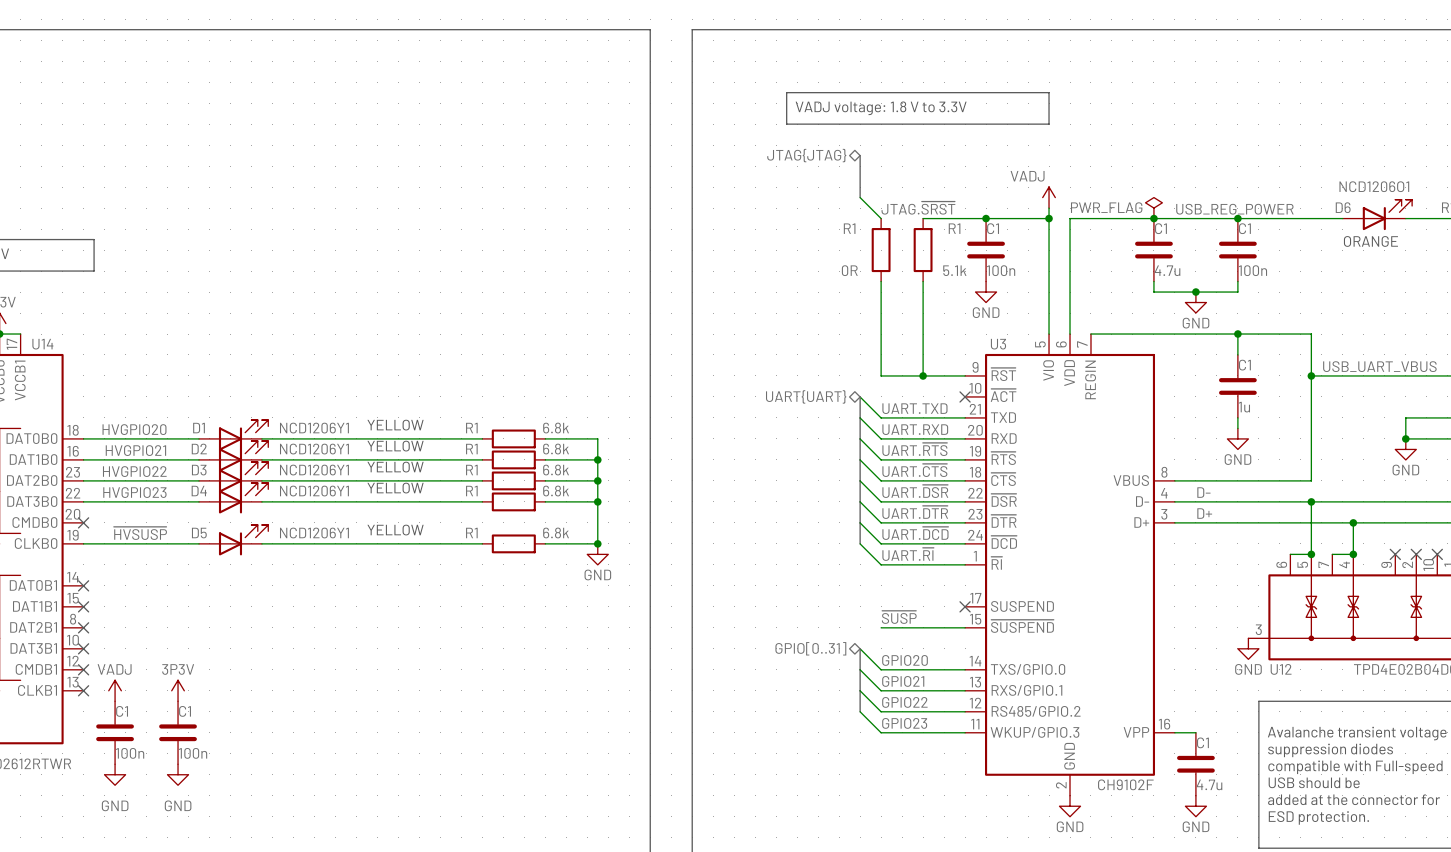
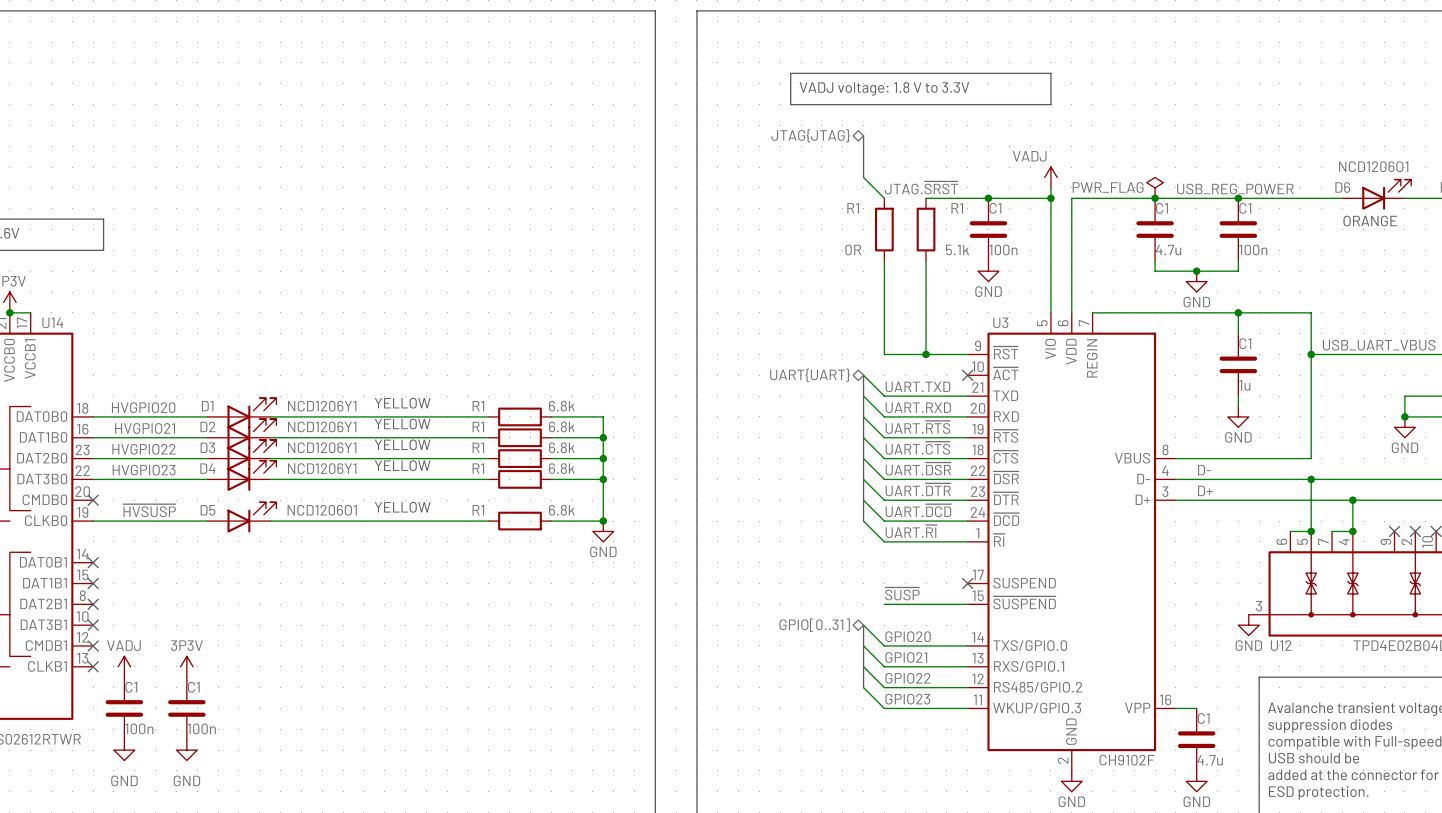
D5 value: NCD1206Y1 (314, 533) -> NCD1206O1 (322, 510)

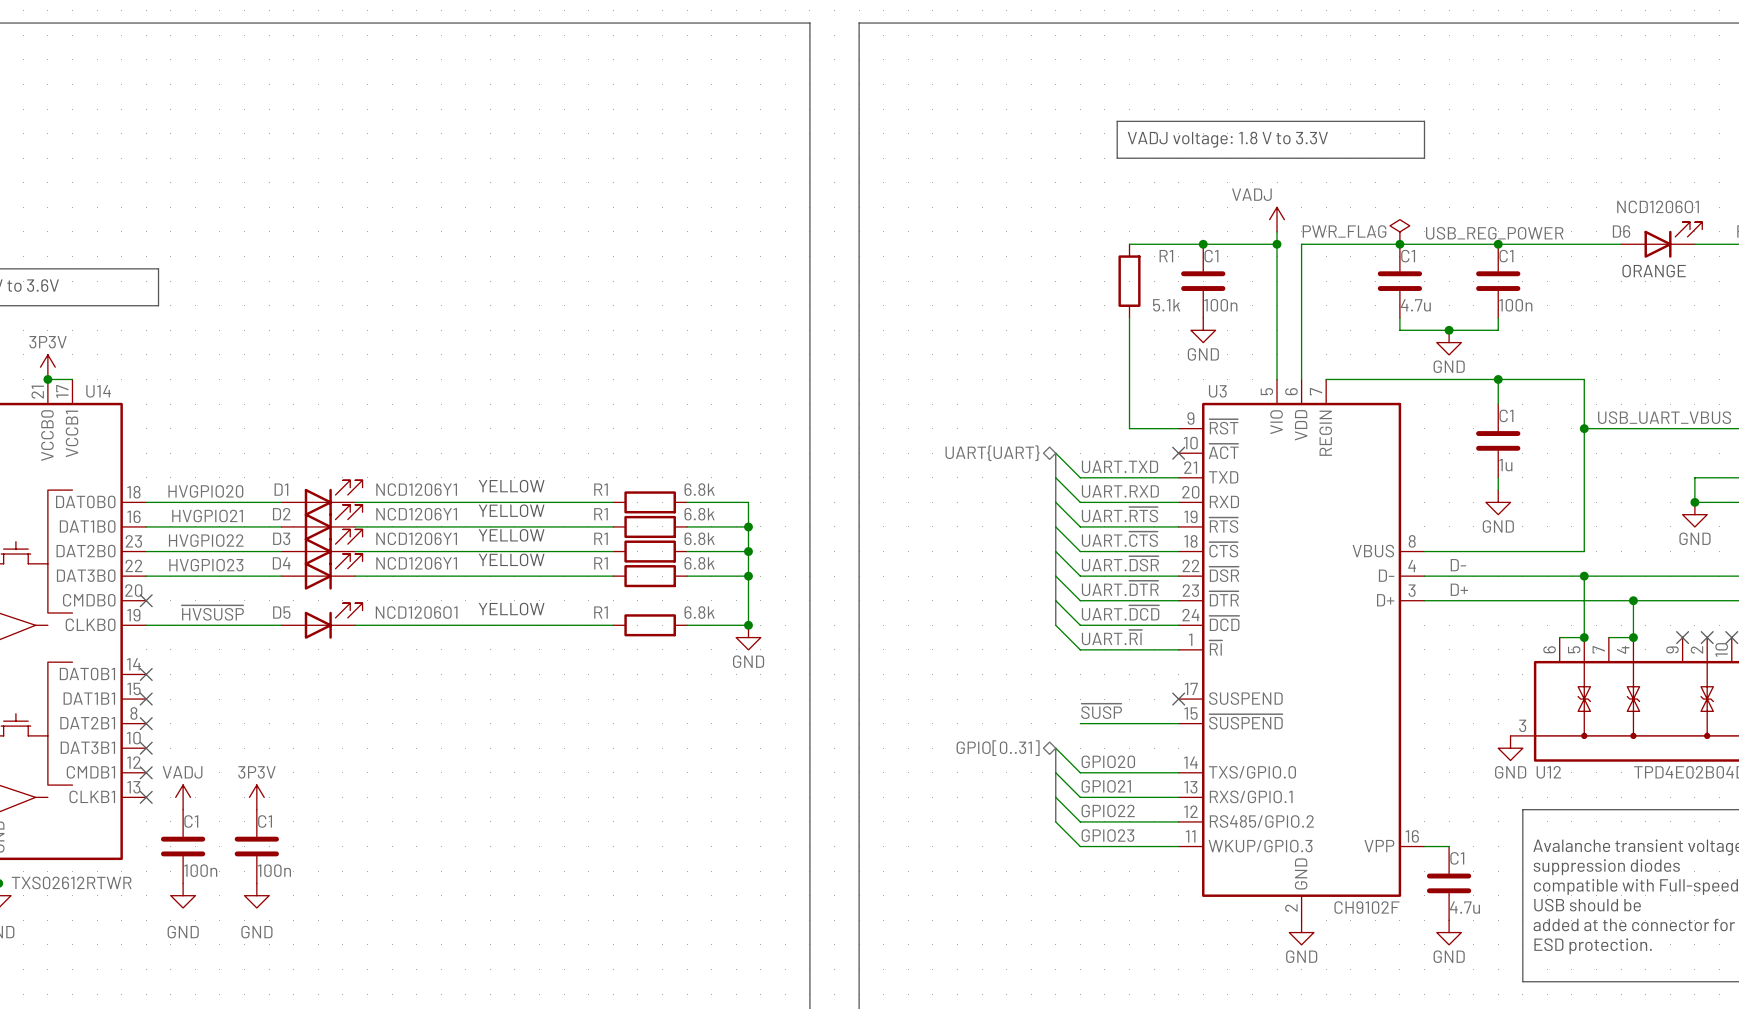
line: (790, 73) (1050, 73) (1050, 104) (790, 104) (790, 73) -> (1117, 121) (1424, 121) (1424, 158) (1117, 158) (1117, 121)
text position: VADJ voltage: 1.8 V to 3.3V (884, 88) -> VADJ voltage: 1.8 V to 3.3V (1227, 139)
hierarchical label: JTAG{JTAG} (810, 135) -> none
bus: (863, 135) (863, 177) -> none
wire: (863, 177) (884, 198) -> none
label: JTAG.~{SRST} (921, 187) -> none
R1: 0R (884, 229) -> none
wire: (884, 260) (884, 354) (926, 354) -> none
junction: (926, 354) -> none

